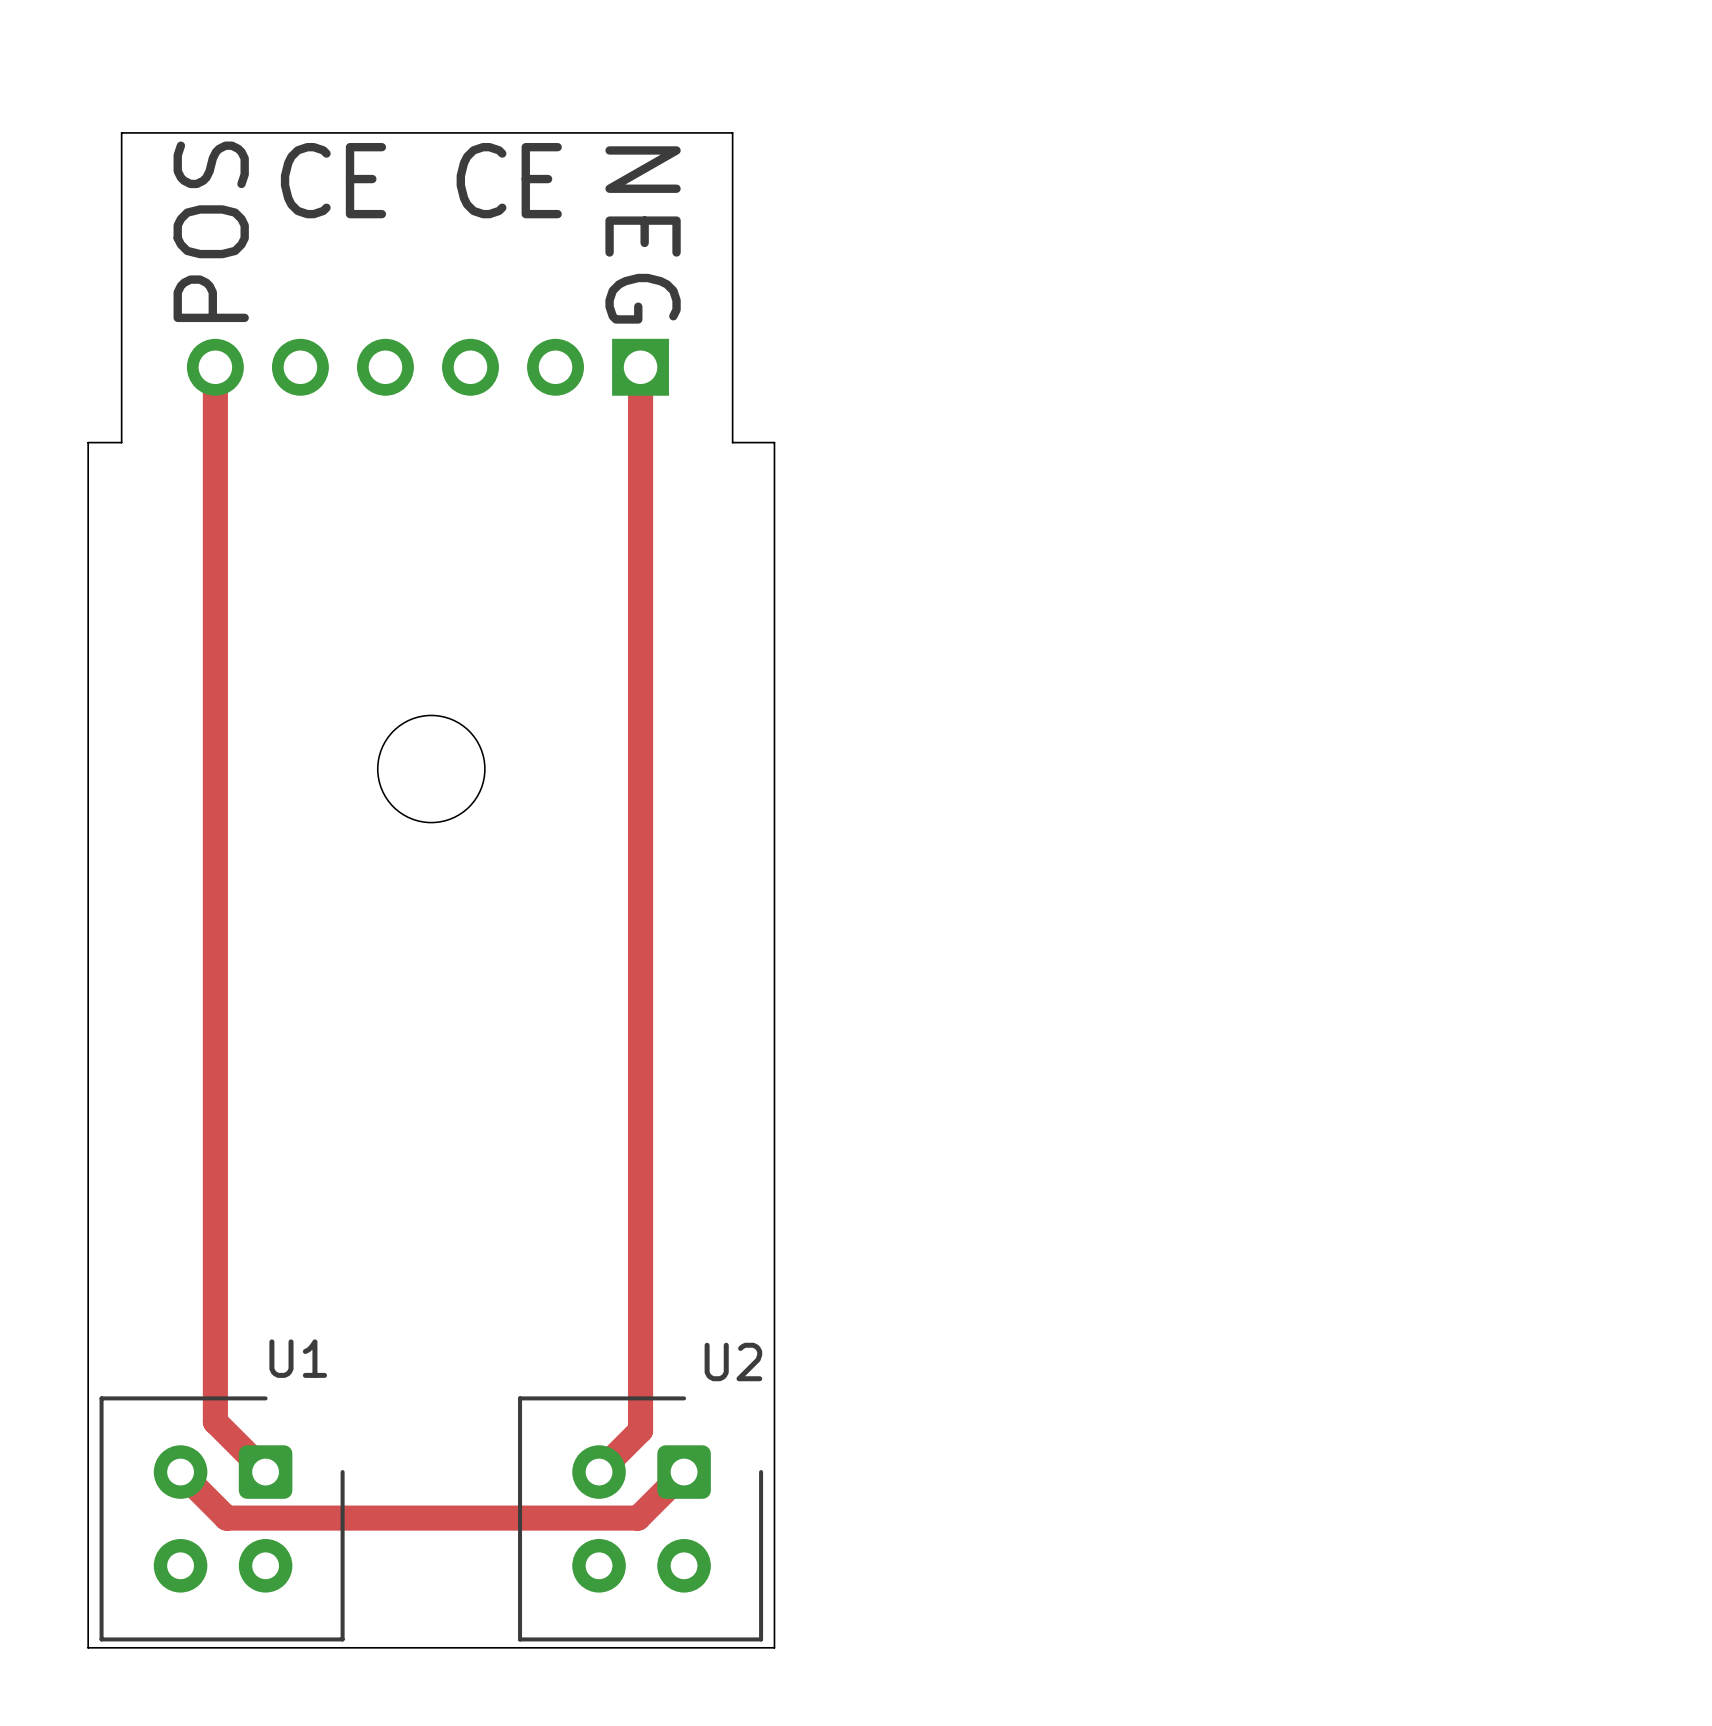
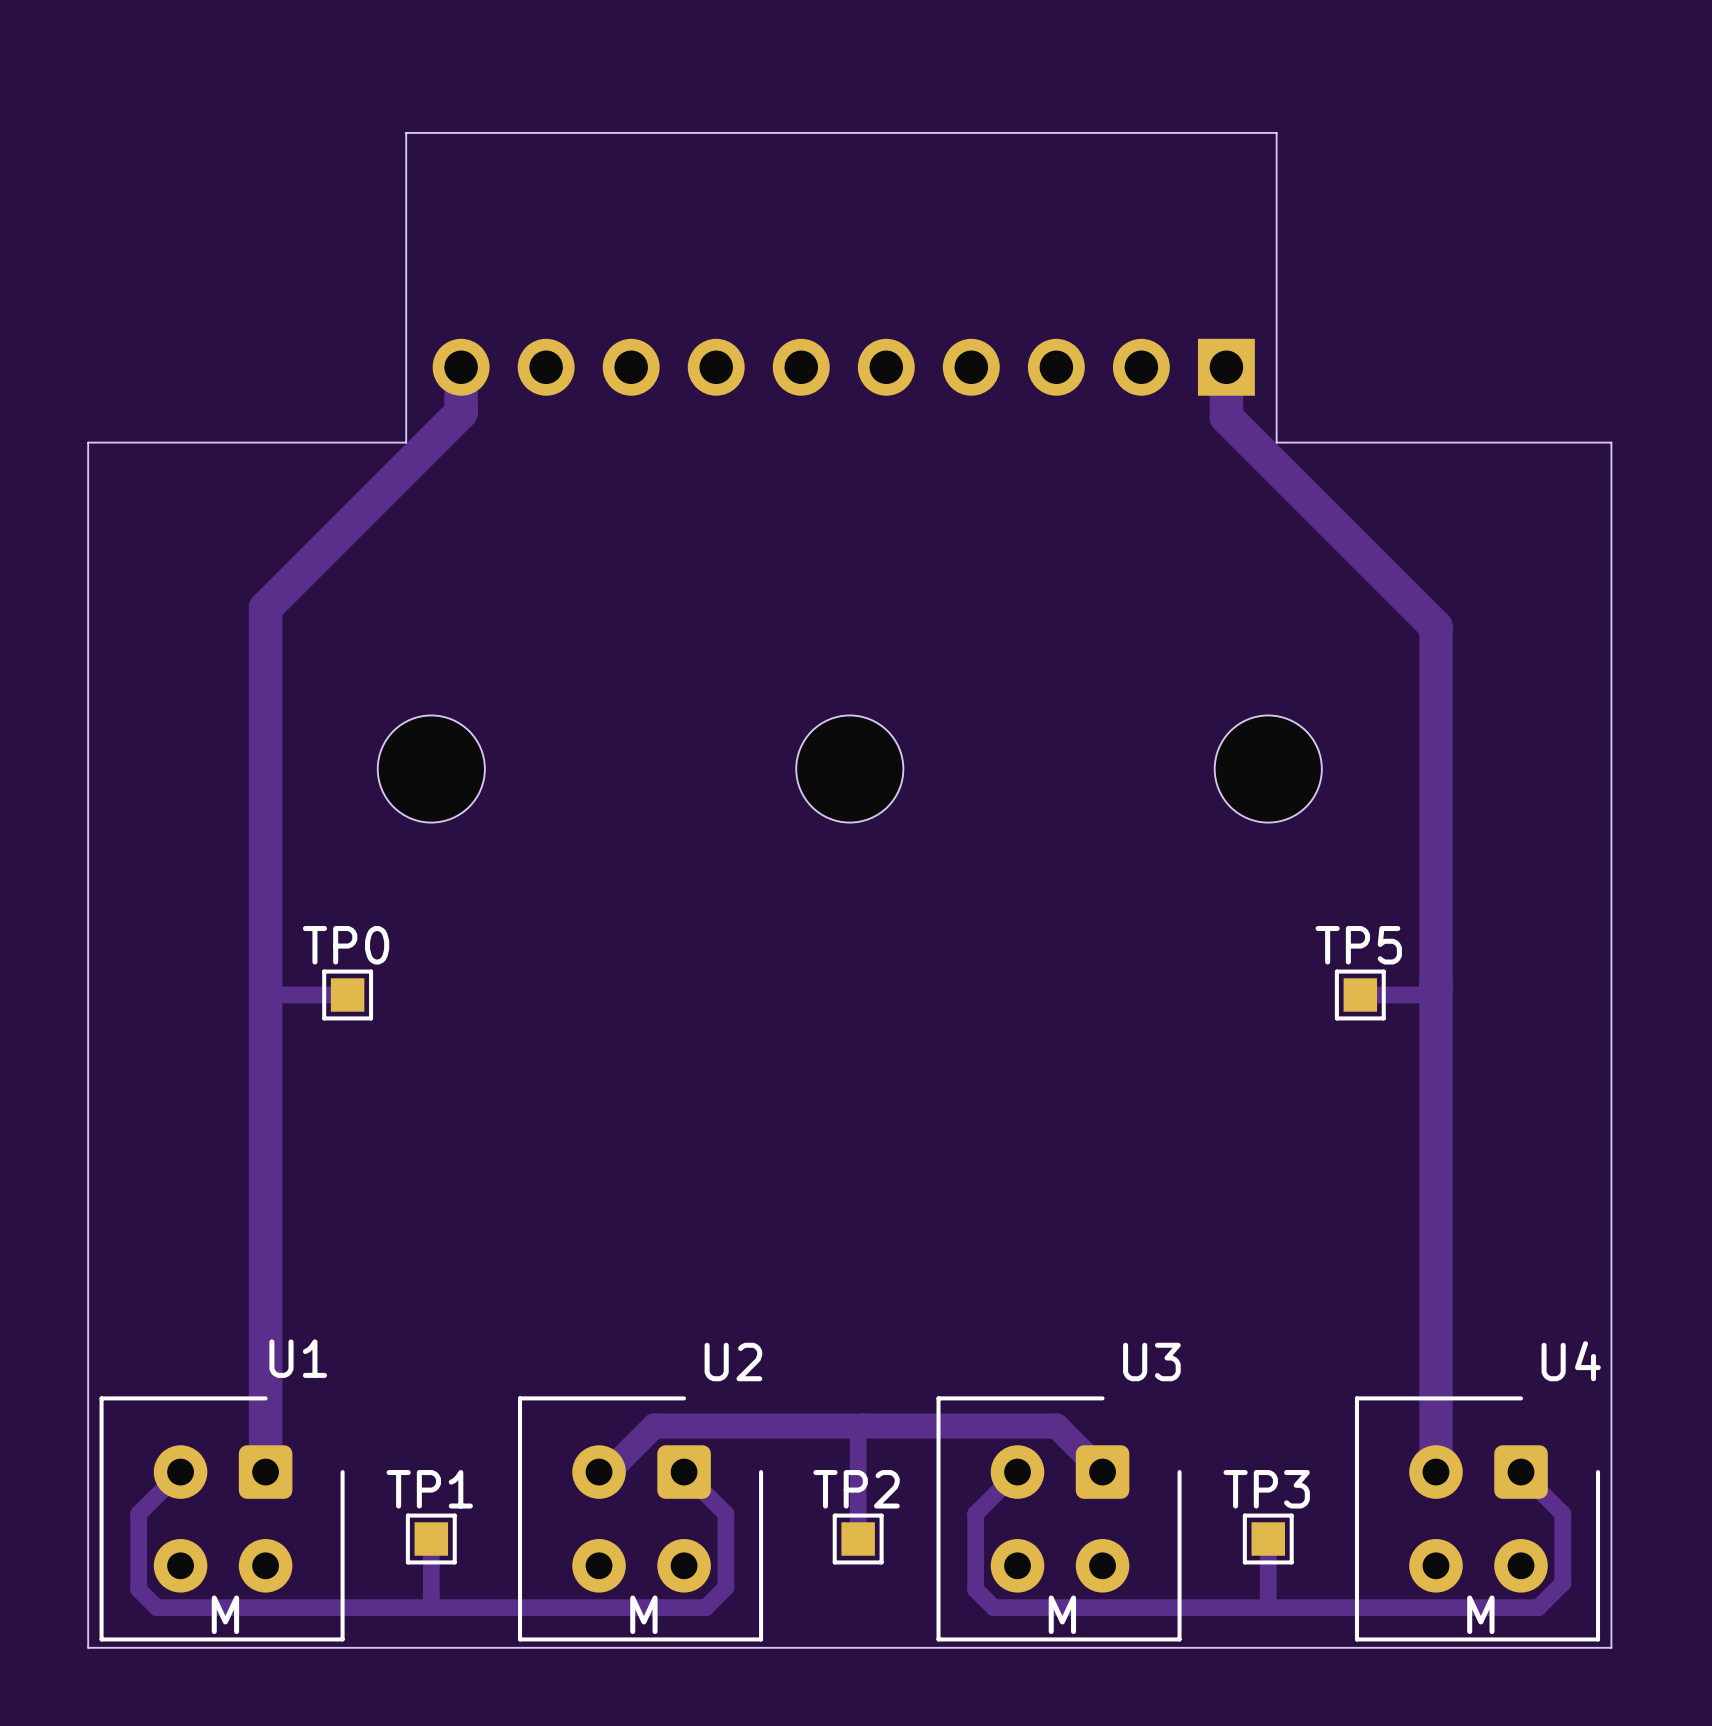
board edge: (406, 132) (121, 132) (121, 442) -> (406, 132) (406, 442) (121, 442)
board edge: (732, 132) (732, 442) (774, 442) (774, 1647) -> (732, 132) (1276, 132) (1276, 442) (1611, 442) (1611, 1647) (774, 1647)
text: C (305, 180) -> none
text: E (365, 180) -> none
text: C (481, 180) -> none
text: E (541, 180) -> none
text: POS (211, 231) -> none
text: NEG (643, 234) -> none
track: (215, 367) (215, 1421) (265, 1472) -> (461, 367) (461, 412) (265, 608) (265, 1472)
part: (427, 367) -> none
track: (640, 367) (640, 1430) (599, 1472) -> (1102, 1472) (1056, 1426) (654, 1426) (608, 1472) (599, 1472)
part: none -> (843, 367)
track: none -> (1226, 367) (1226, 417) (1435, 626) (1435, 1472)
part: none -> (849, 769)
part: none -> (1268, 769)
track: none -> (1435, 986) (1427, 994) (1360, 994)
track: none -> (347, 994) (267, 994) (265, 996)
TP0: none -> (347, 994)
TP5: none -> (1360, 994)
track: none -> (862, 1426) (858, 1430) (858, 1539)
track: (180, 1472) (226, 1518) (638, 1518) (684, 1472) -> (180, 1472) (138, 1513) (138, 1589) (156, 1607) (705, 1607) (725, 1587) (725, 1513) (684, 1472)
track: none -> (1017, 1472) (975, 1513) (975, 1589) (993, 1607) (1538, 1607) (1562, 1583) (1562, 1513) (1521, 1472)
U3: none -> (1059, 1518)
U4: none -> (1477, 1518)
track: none -> (431, 1539) (431, 1605) (429, 1607)
TP1: none -> (431, 1539)
TP2: none -> (858, 1539)
track: none -> (1268, 1539) (1268, 1605) (1266, 1607)
TP3: none -> (1268, 1539)
U1 text: none -> M (225, 1614)
U2 text: none -> M (643, 1614)

